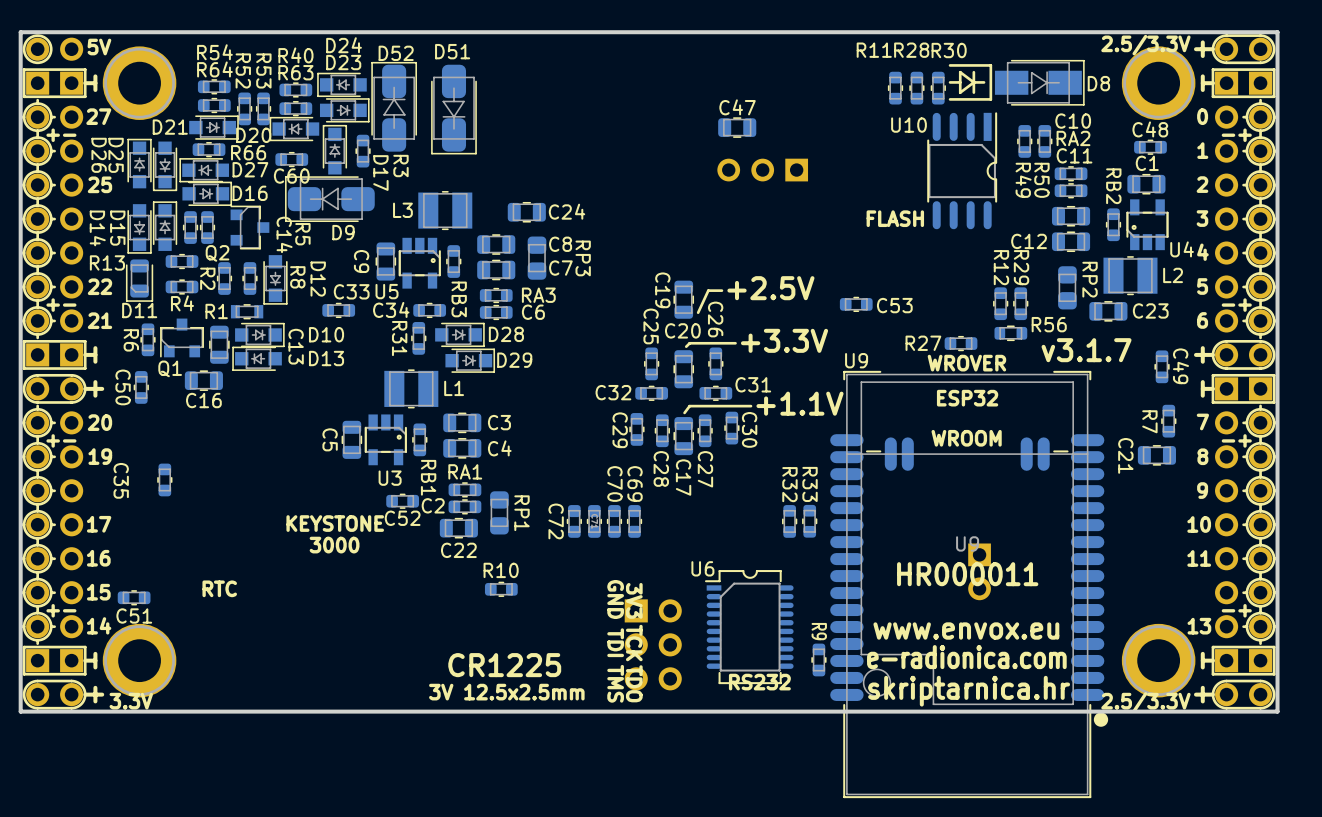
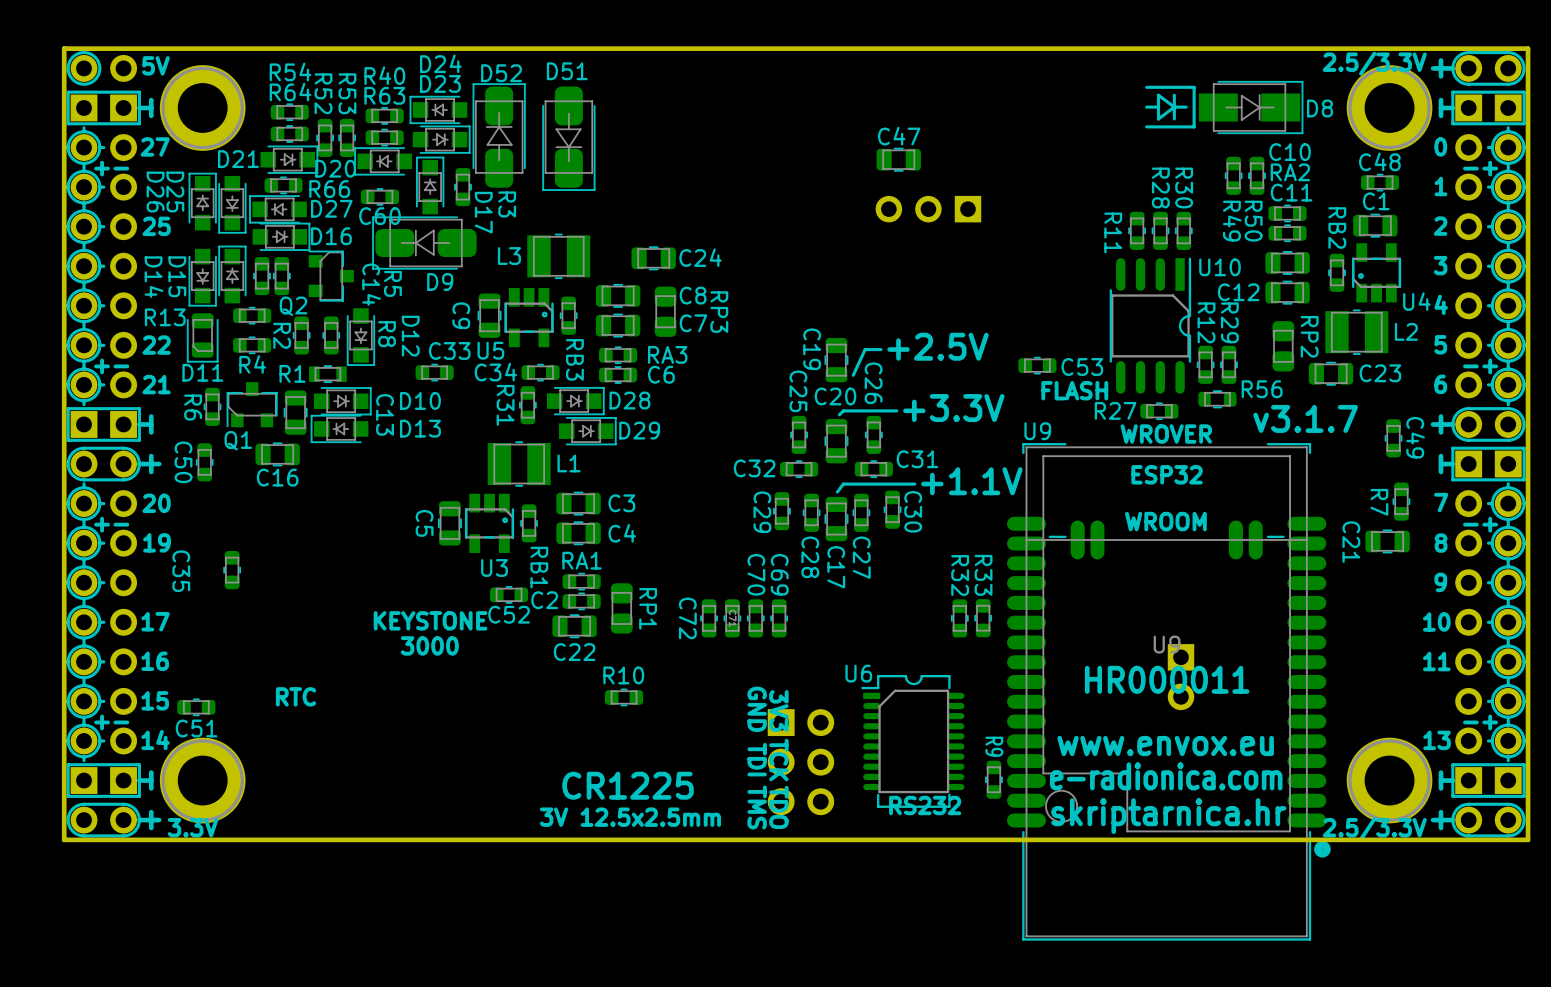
R11 name rotation: 0° (874, 50) -> 90° clockwise (1113, 232)
R28 name rotation: 0° (911, 50) -> 90° clockwise (1160, 187)
R30 name rotation: 0° (949, 50) -> 90° clockwise (1184, 188)
R11 position: (895, 88) -> (1137, 230)
R28 position: (916, 88) -> (1160, 230)
R30 position: (938, 88) -> (1183, 230)
U10 name position: U10 (909, 125) -> U10 (1220, 267)
U10 position: (962, 170) -> (1150, 325)
text position: FLASH (895, 218) -> FLASH (1074, 390)

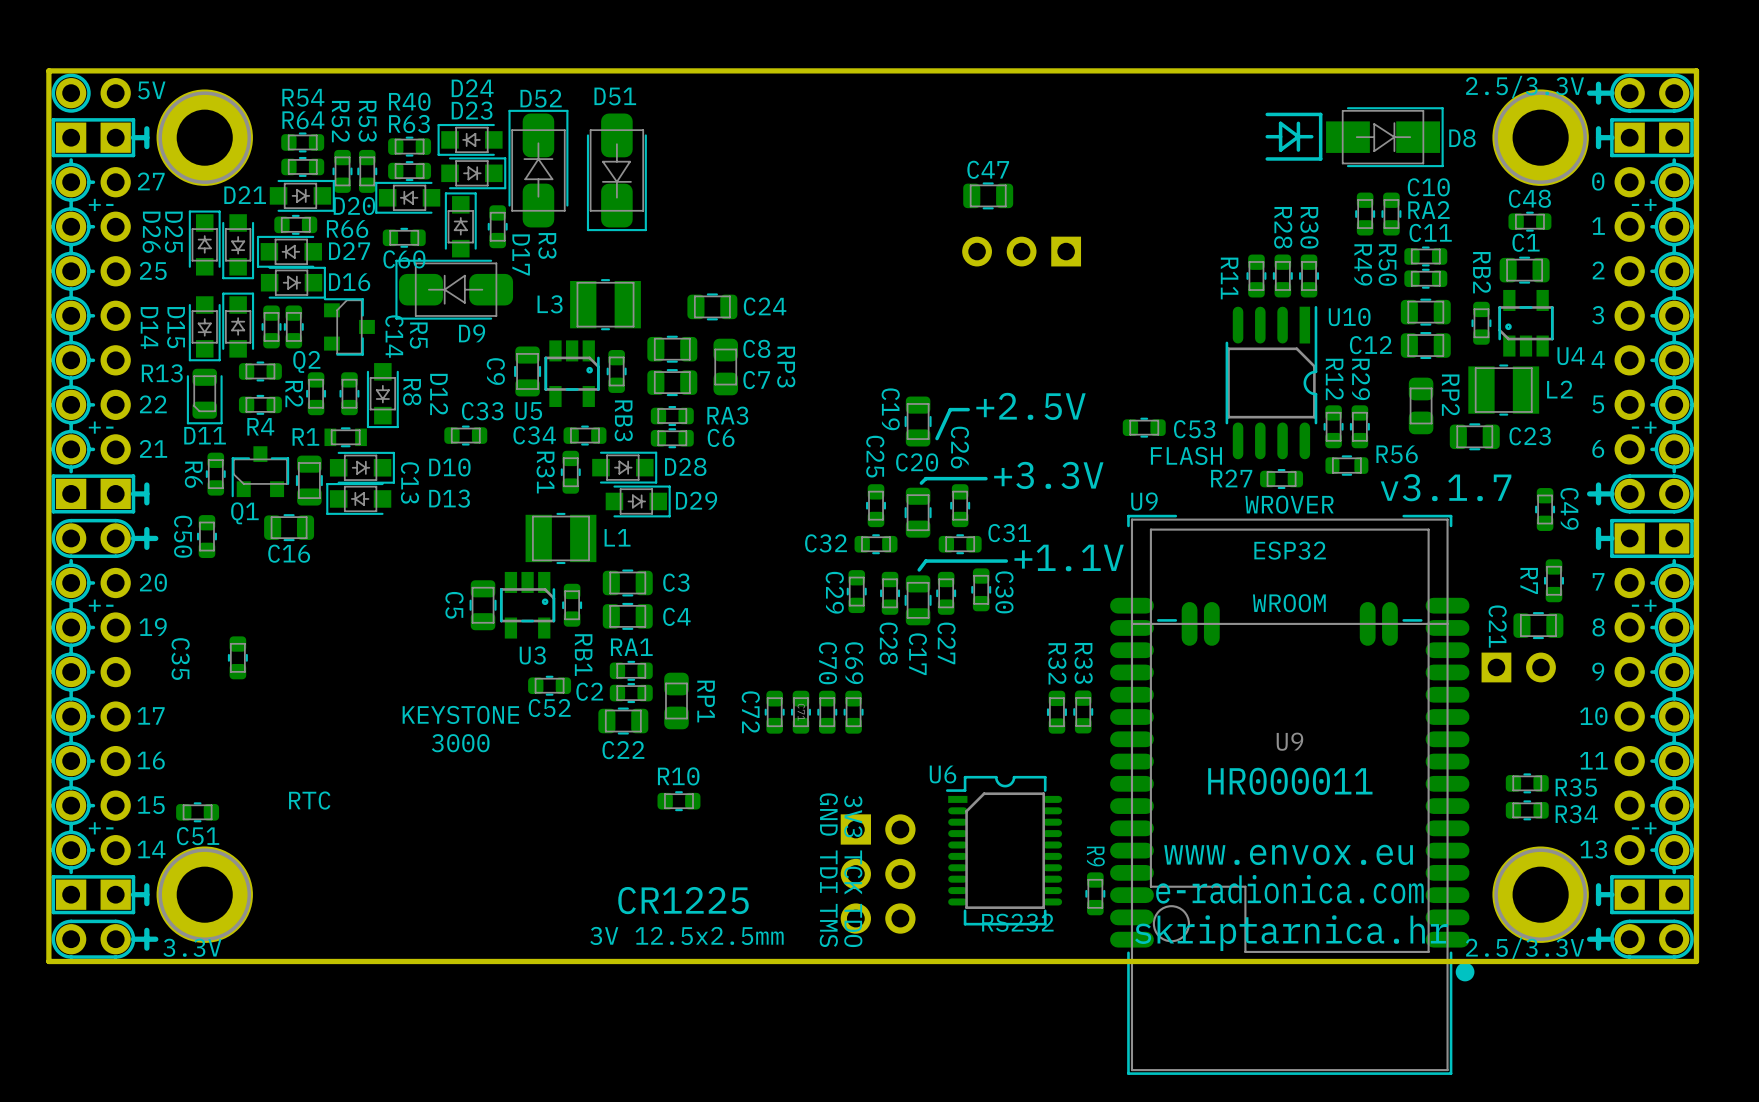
part rotation: 0° (1181, 677) -> 90° counterclockwise (1518, 667)
part position: (1181, 677) -> (1518, 667)
R35: none -> (1527, 783)
R34: none -> (1527, 810)

